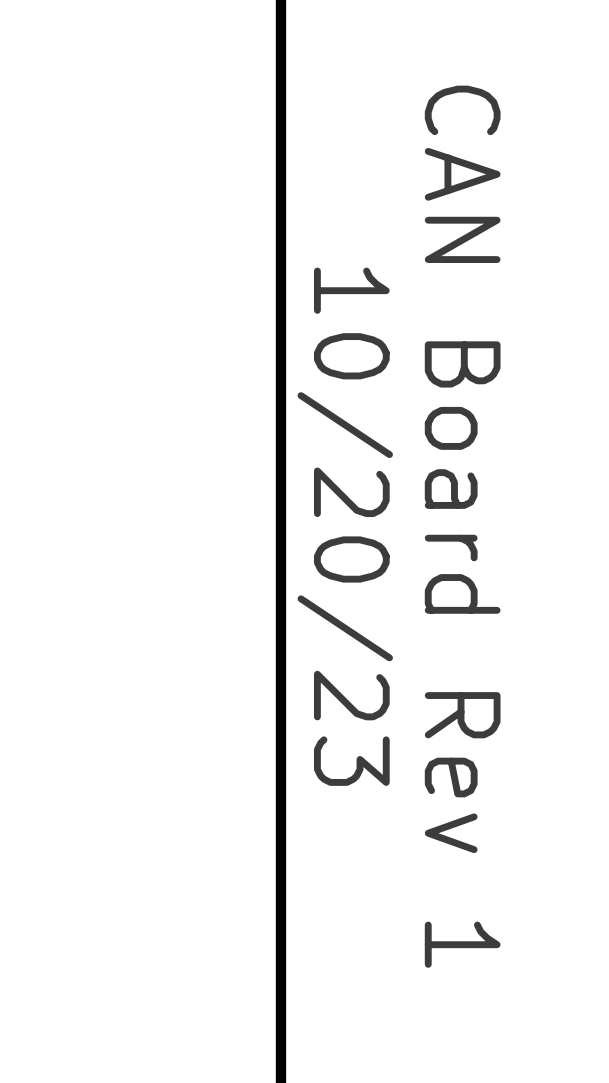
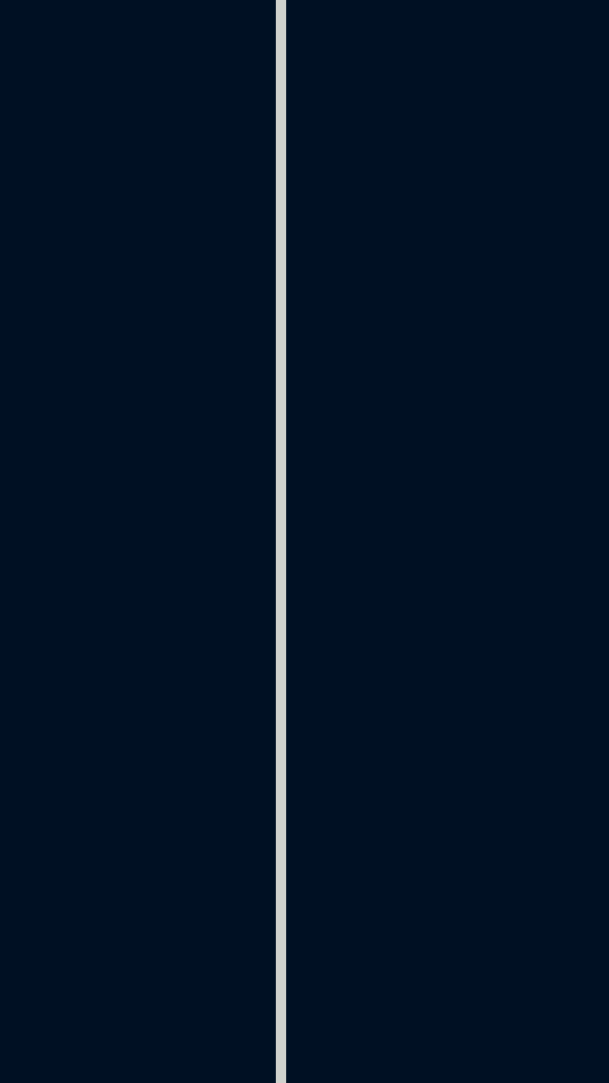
text: 10/20/23 (345, 526) -> none
text: CAN Board Rev 1 (462, 526) -> none

